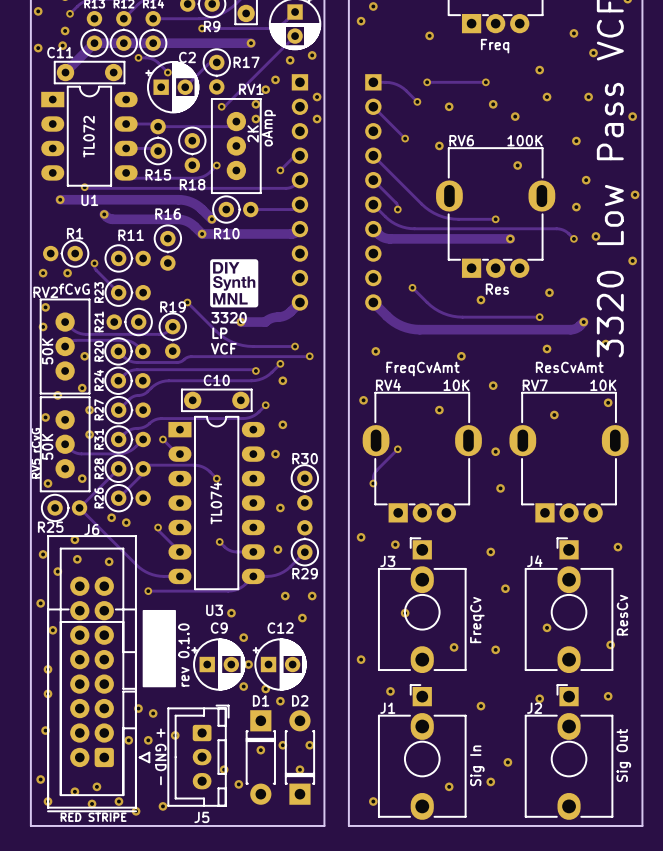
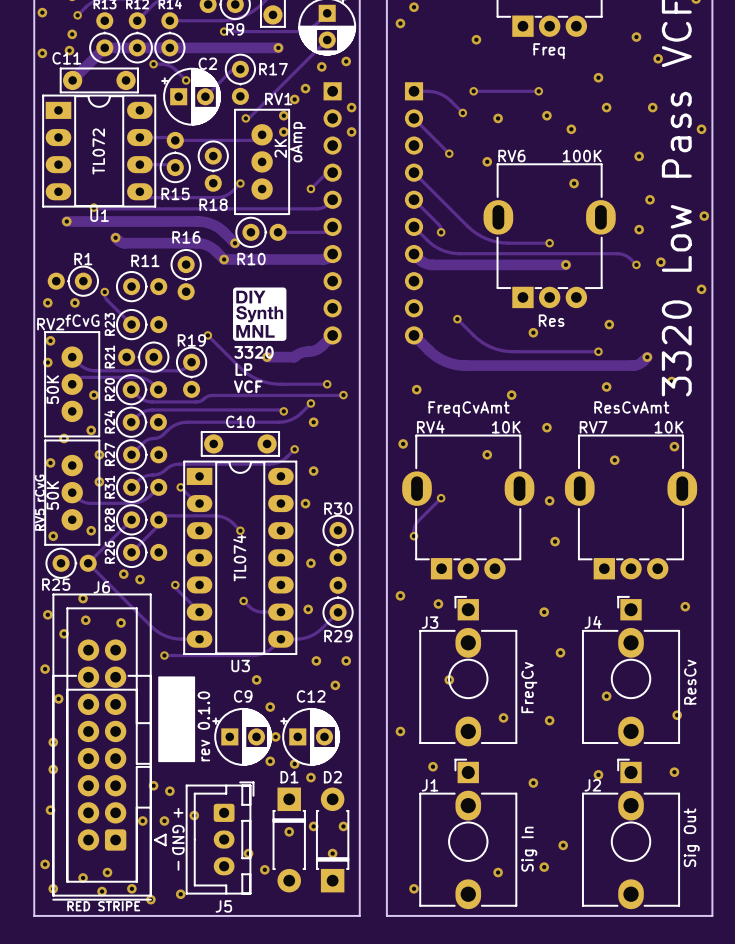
U1 footprint: [41, 86, 138, 187] -> [42, 94, 156, 208]
U3 footprint: [168, 416, 265, 590] -> [183, 460, 297, 655]

